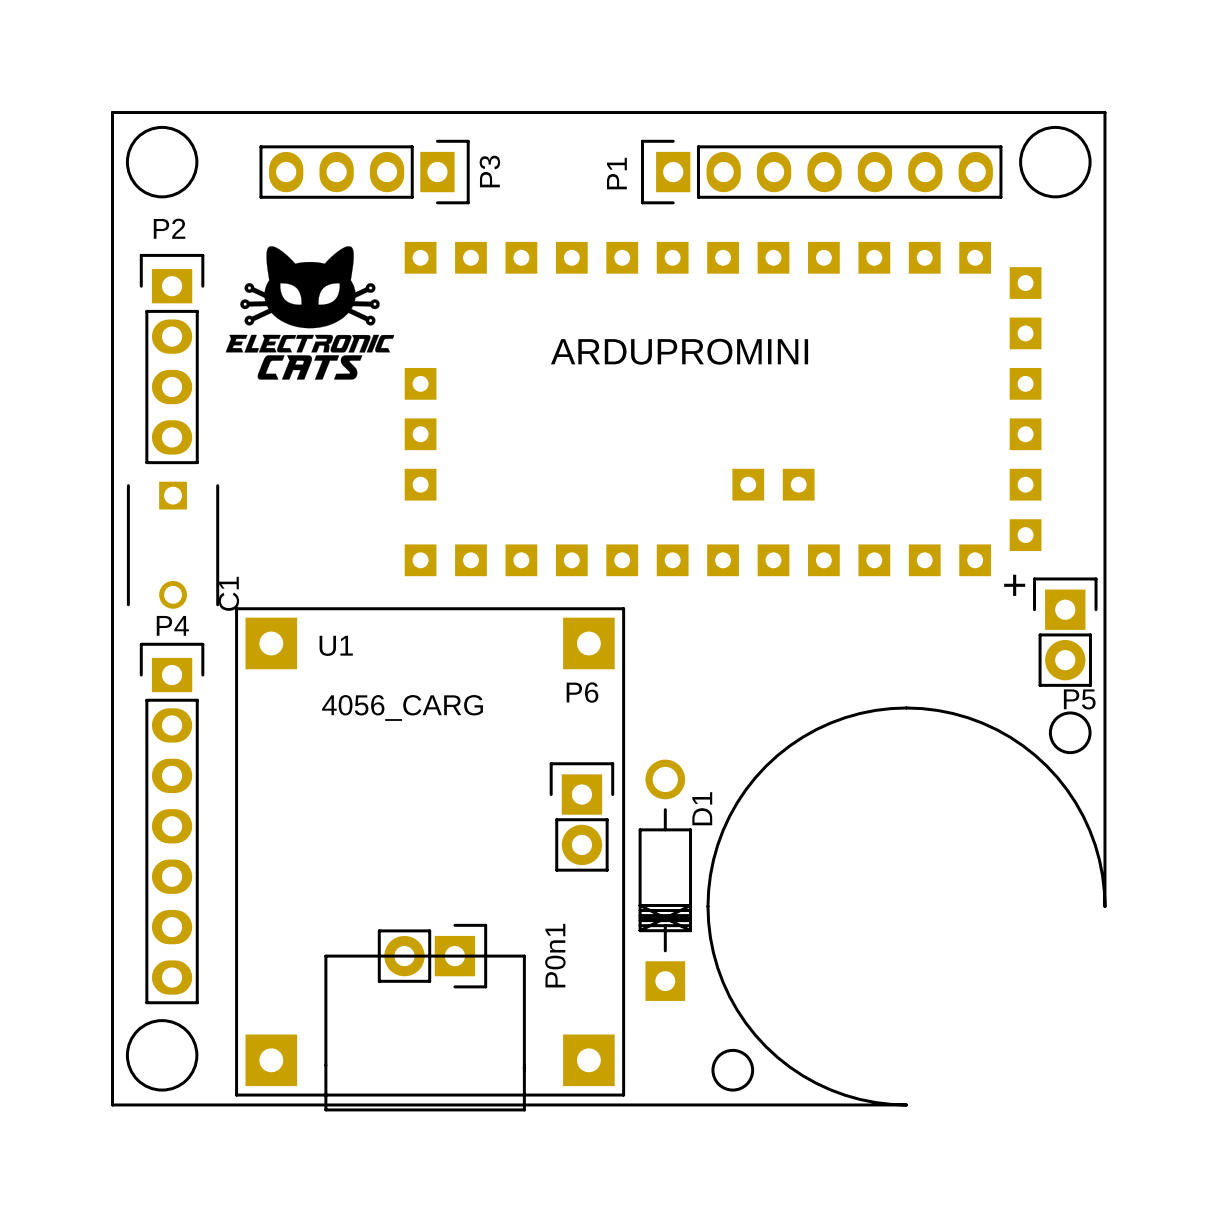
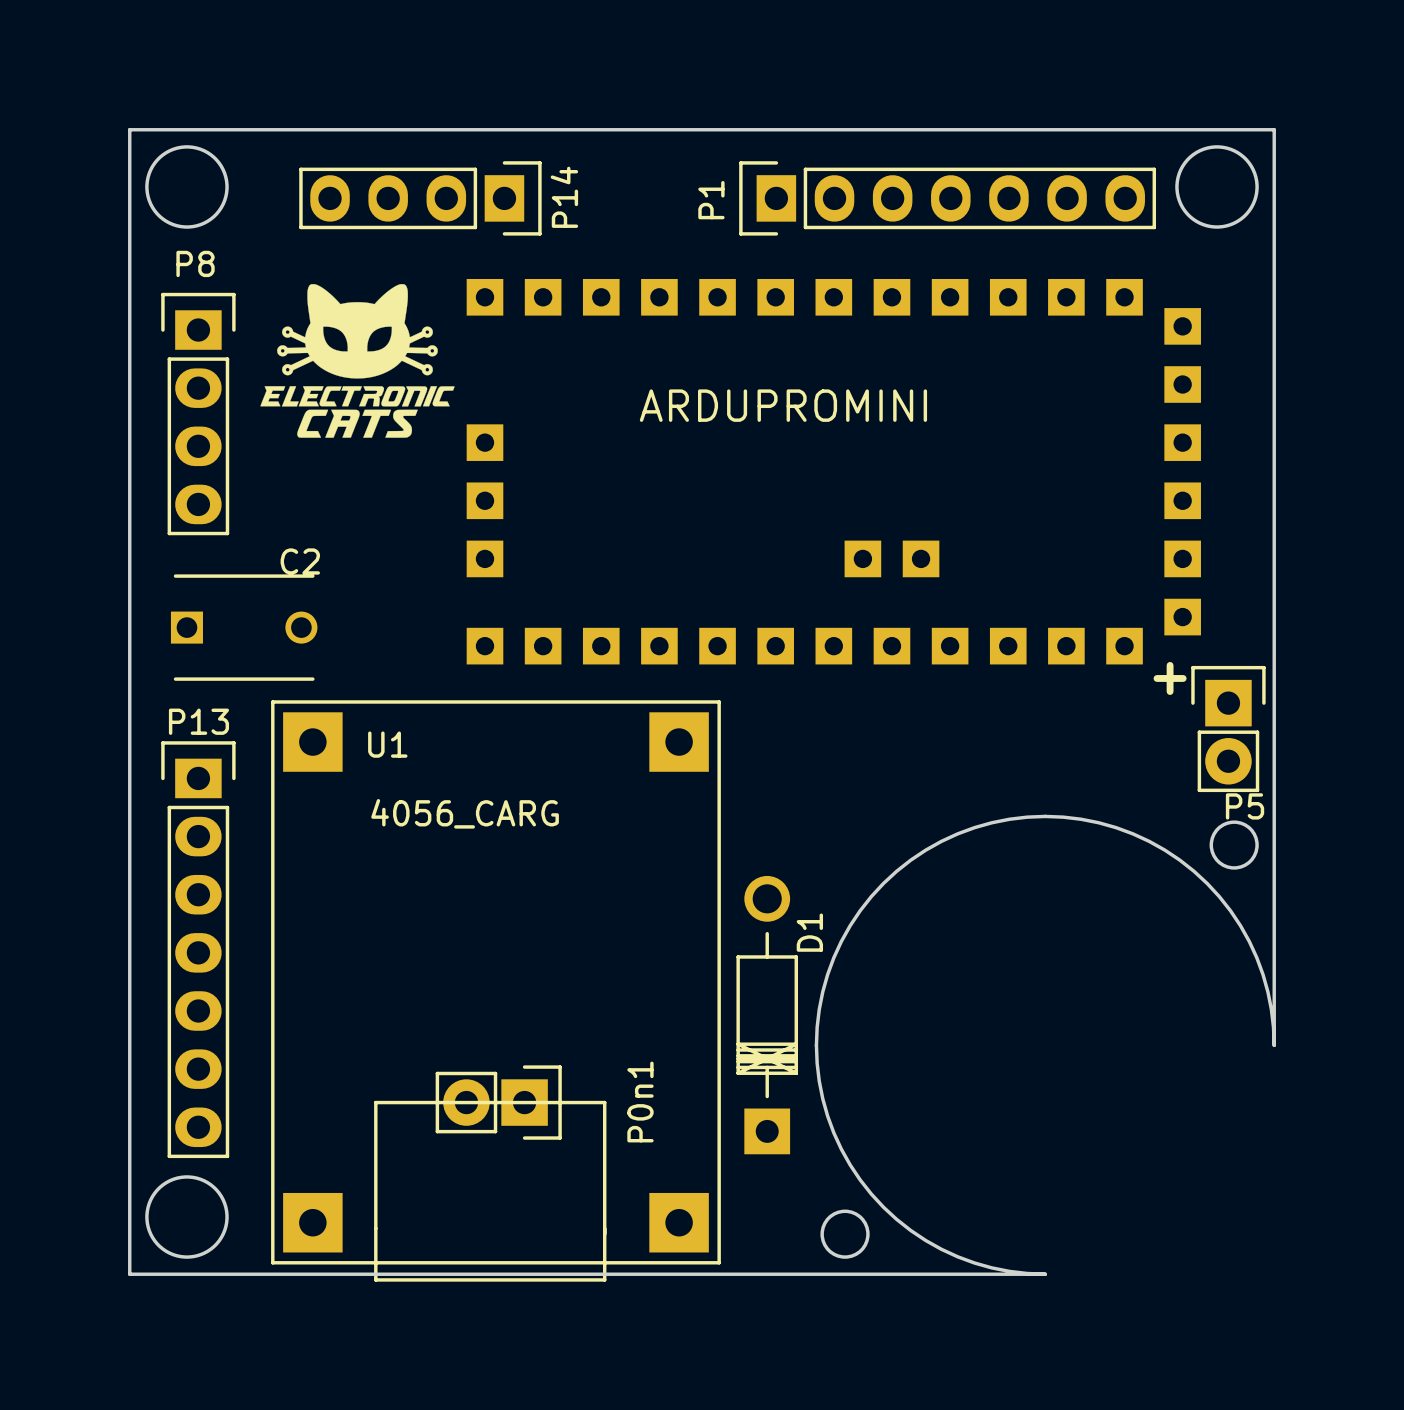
P3 name: P3 (489, 171) -> P14 (564, 197)
P2 name: P2 (169, 228) -> P8 (195, 263)
C2: none -> (244, 627)
C1: (173, 545) -> none
P4 name: P4 (172, 625) -> P13 (198, 721)
P6: (581, 816) -> none

